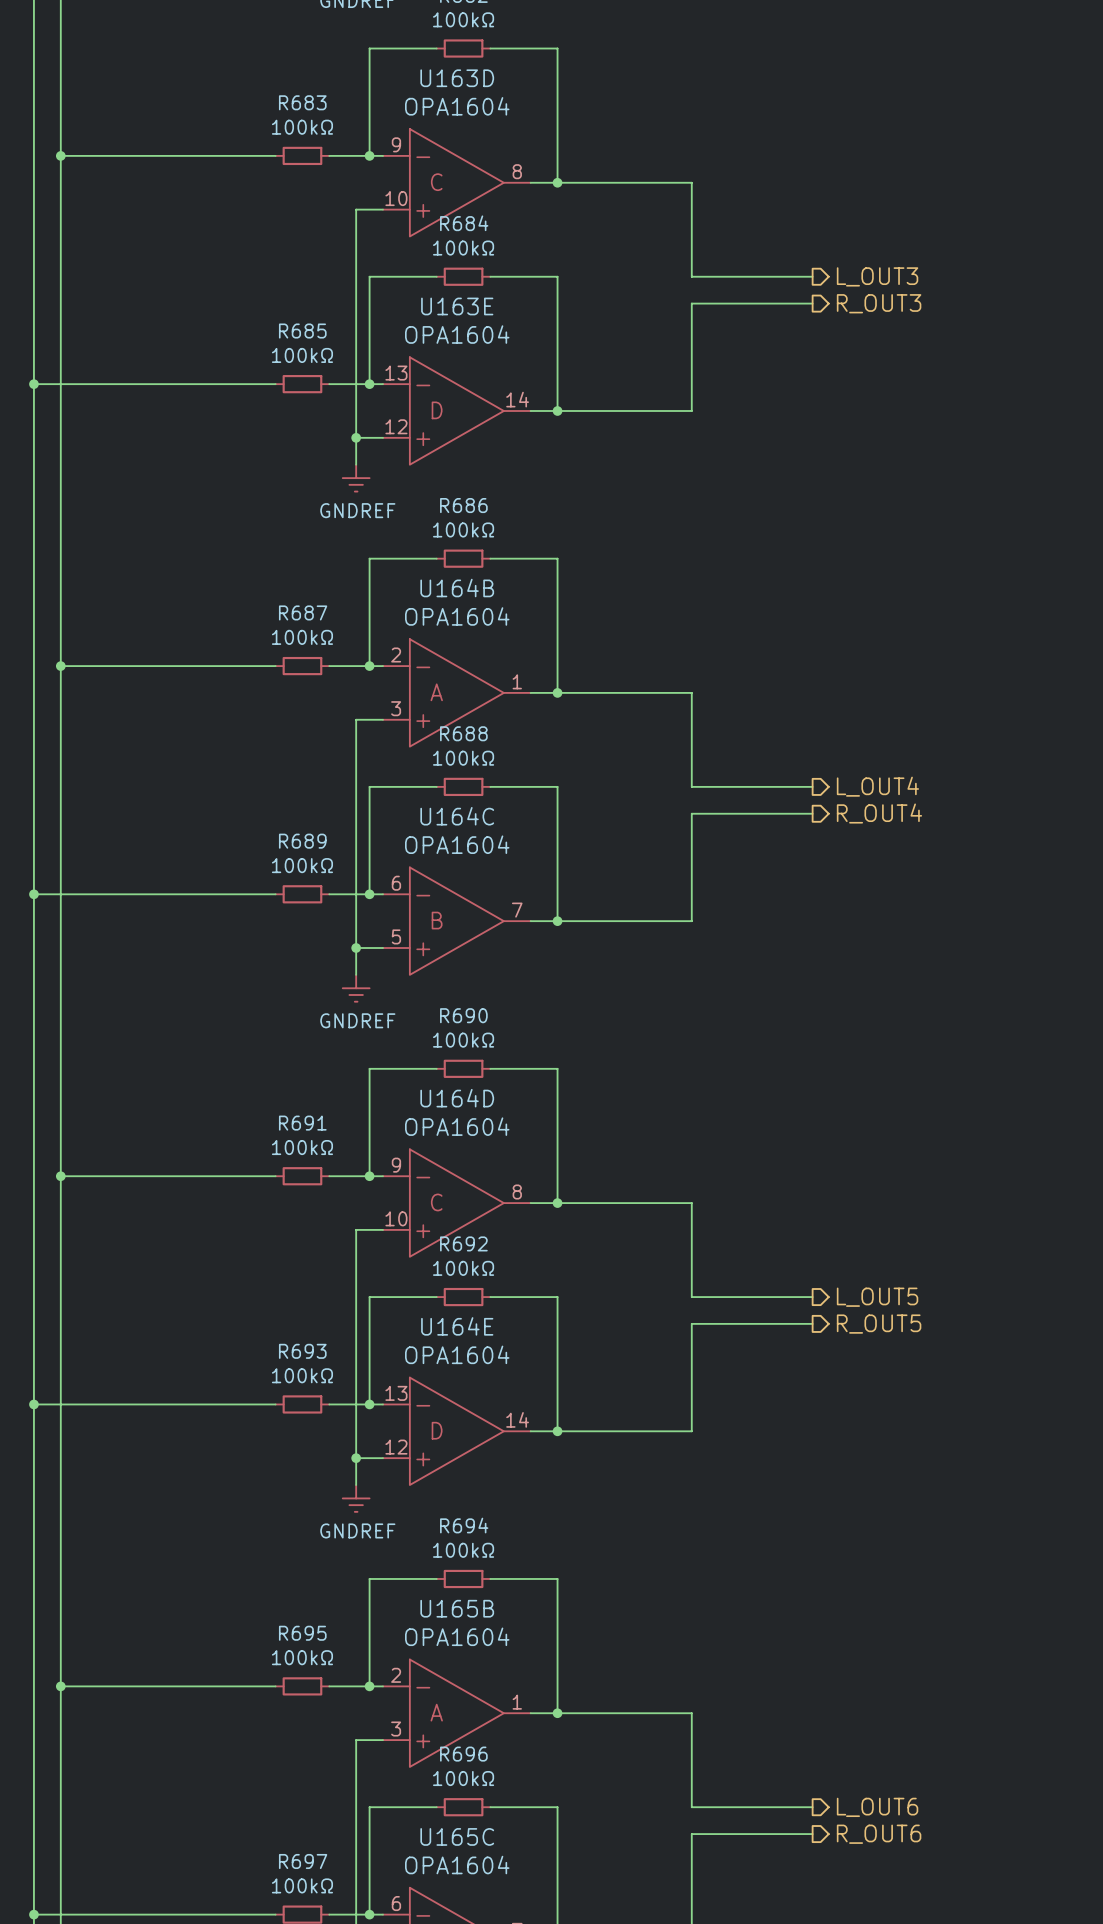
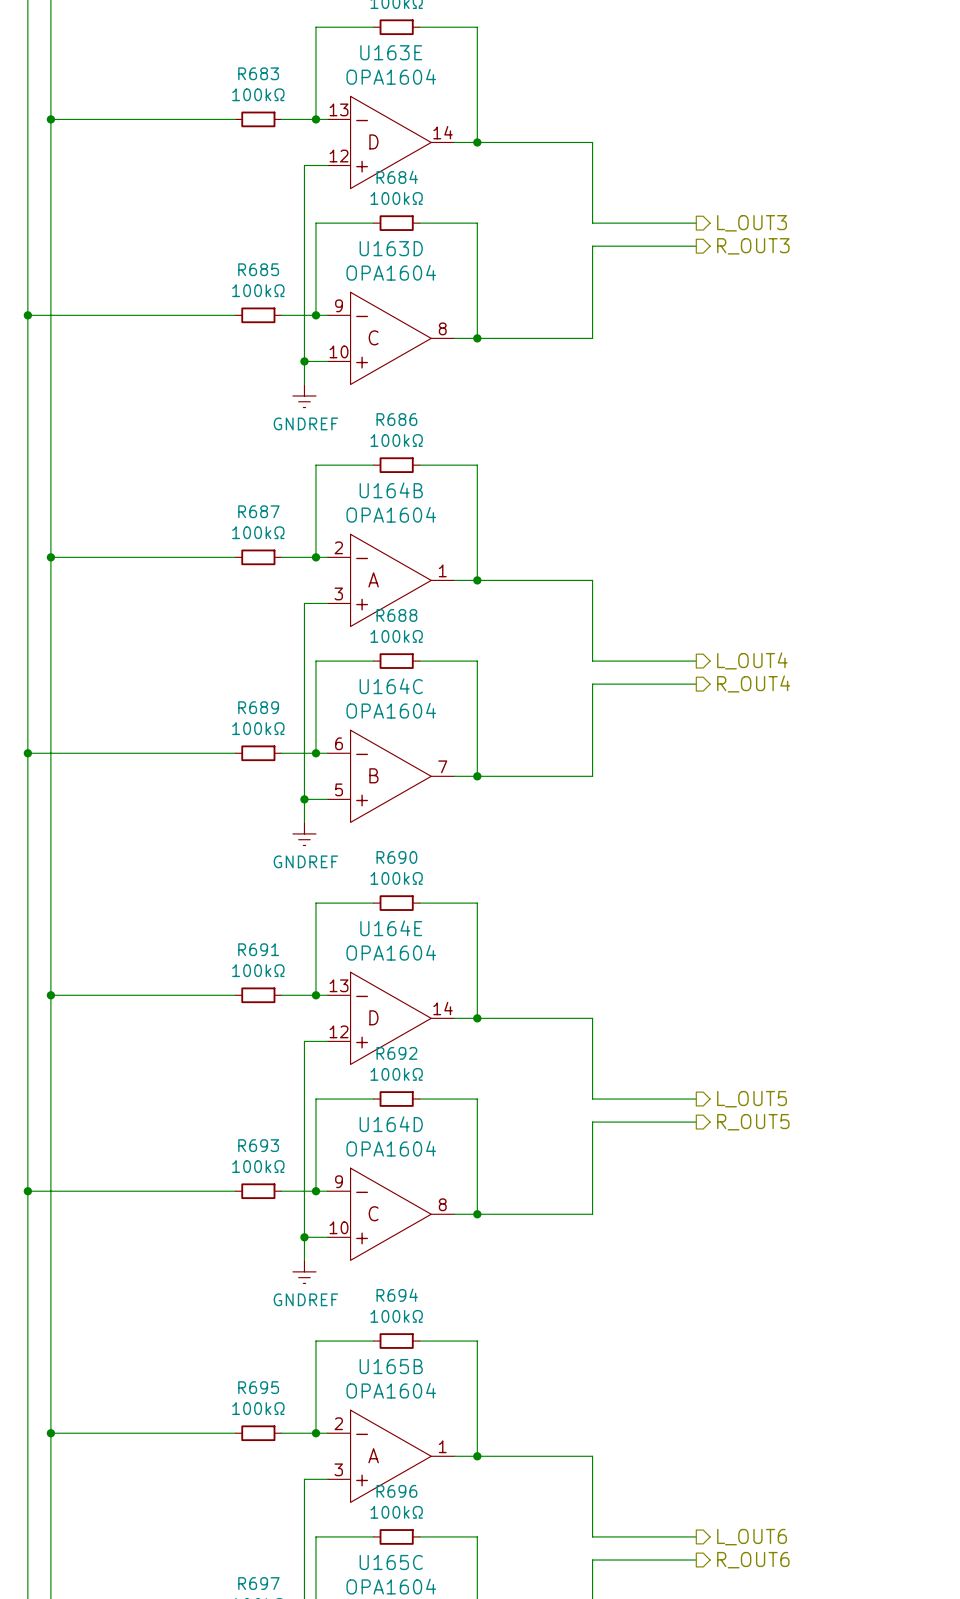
U163D position: (456, 182) -> (390, 338)
U163E position: (456, 410) -> (390, 142)
U164D position: (456, 1203) -> (390, 1214)
U164E position: (456, 1431) -> (390, 1018)

